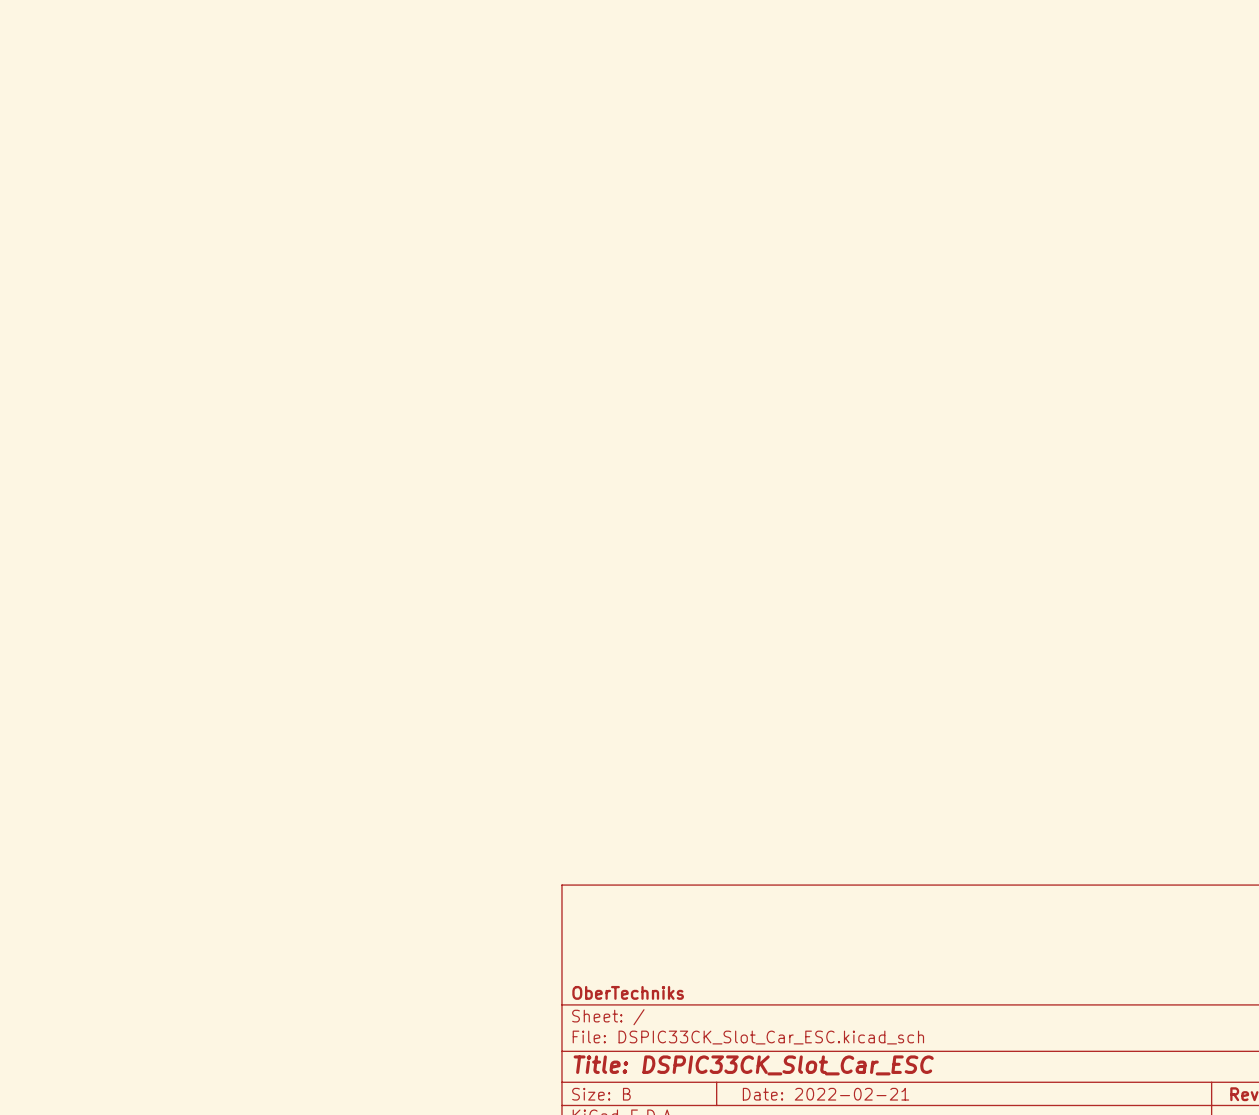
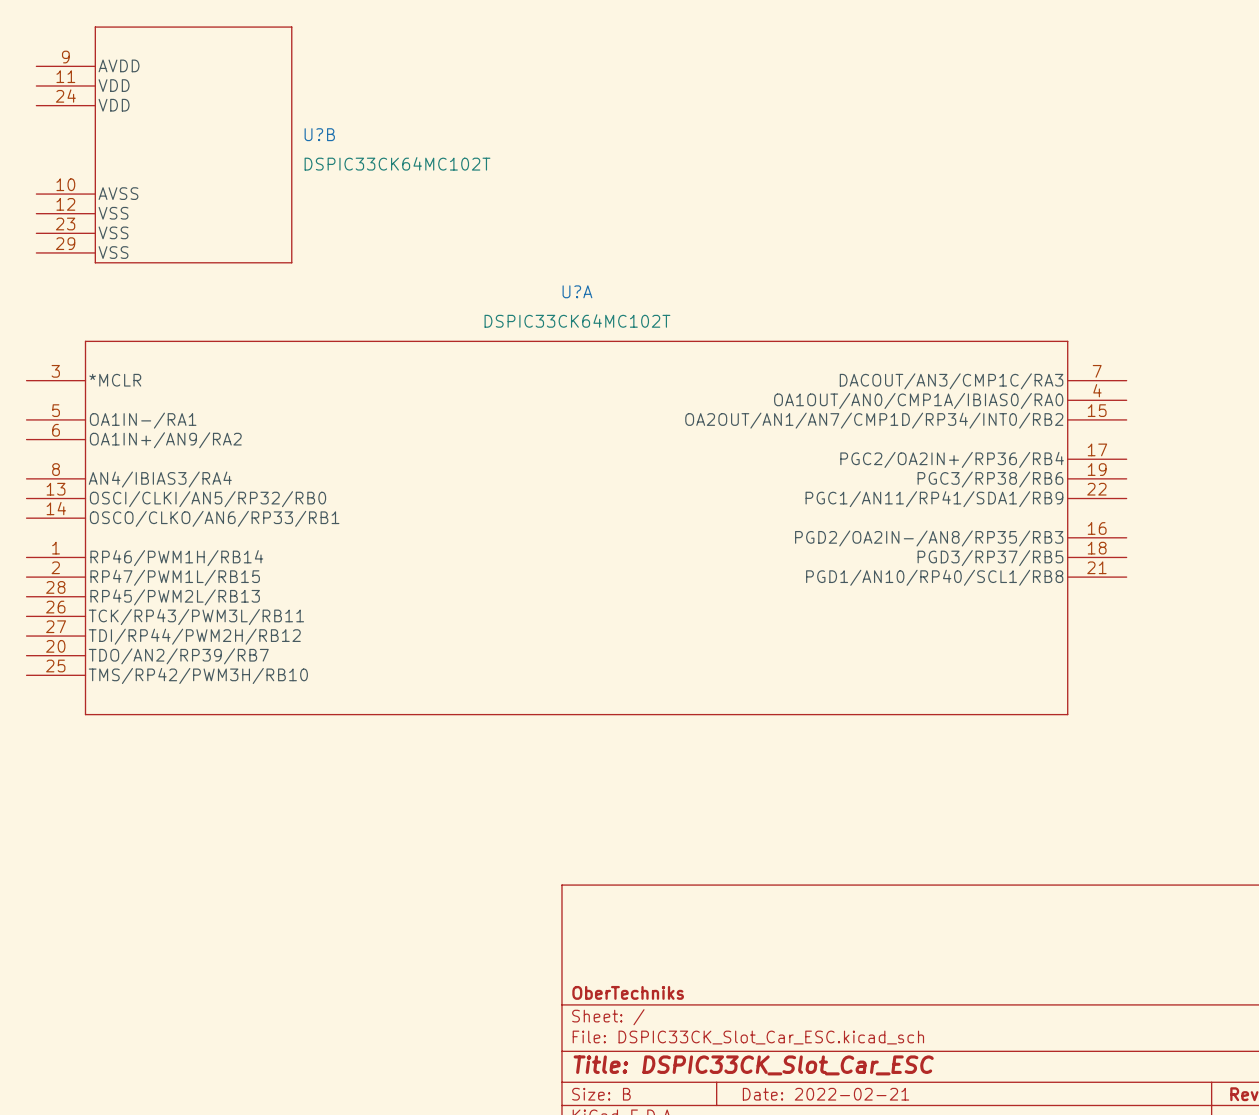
U?B: none -> DSPIC33CK64MC102T (164, 144)
U?A: none -> DSPIC33CK64MC102T (576, 527)

